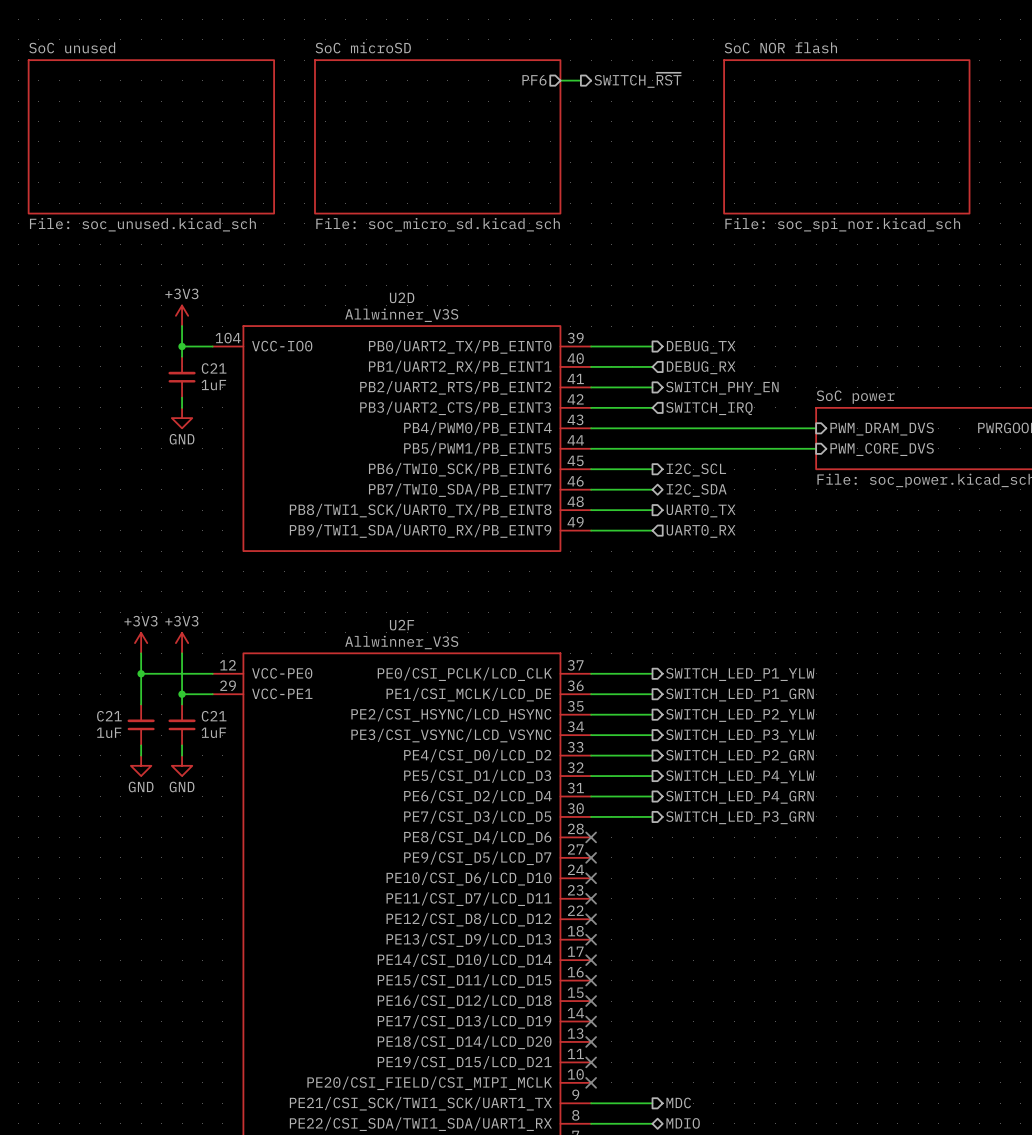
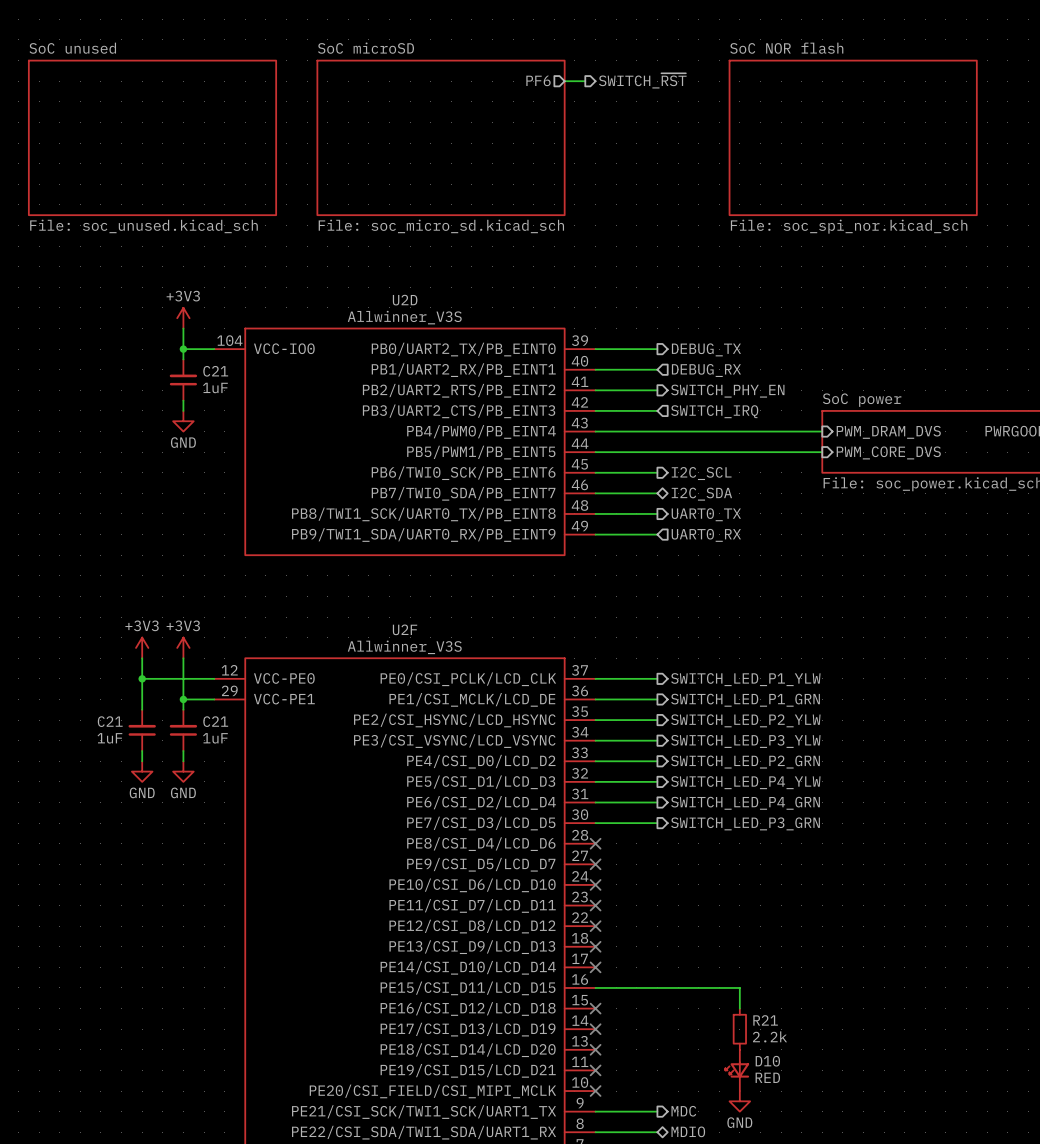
wire: none -> (595, 987) (739, 987) (739, 1008)
no-connect mark: (591, 980) -> none
R21: none -> 2.2k (739, 1029)
D10: none -> RED (737, 1070)
power symbol: none -> GND (739, 1101)

